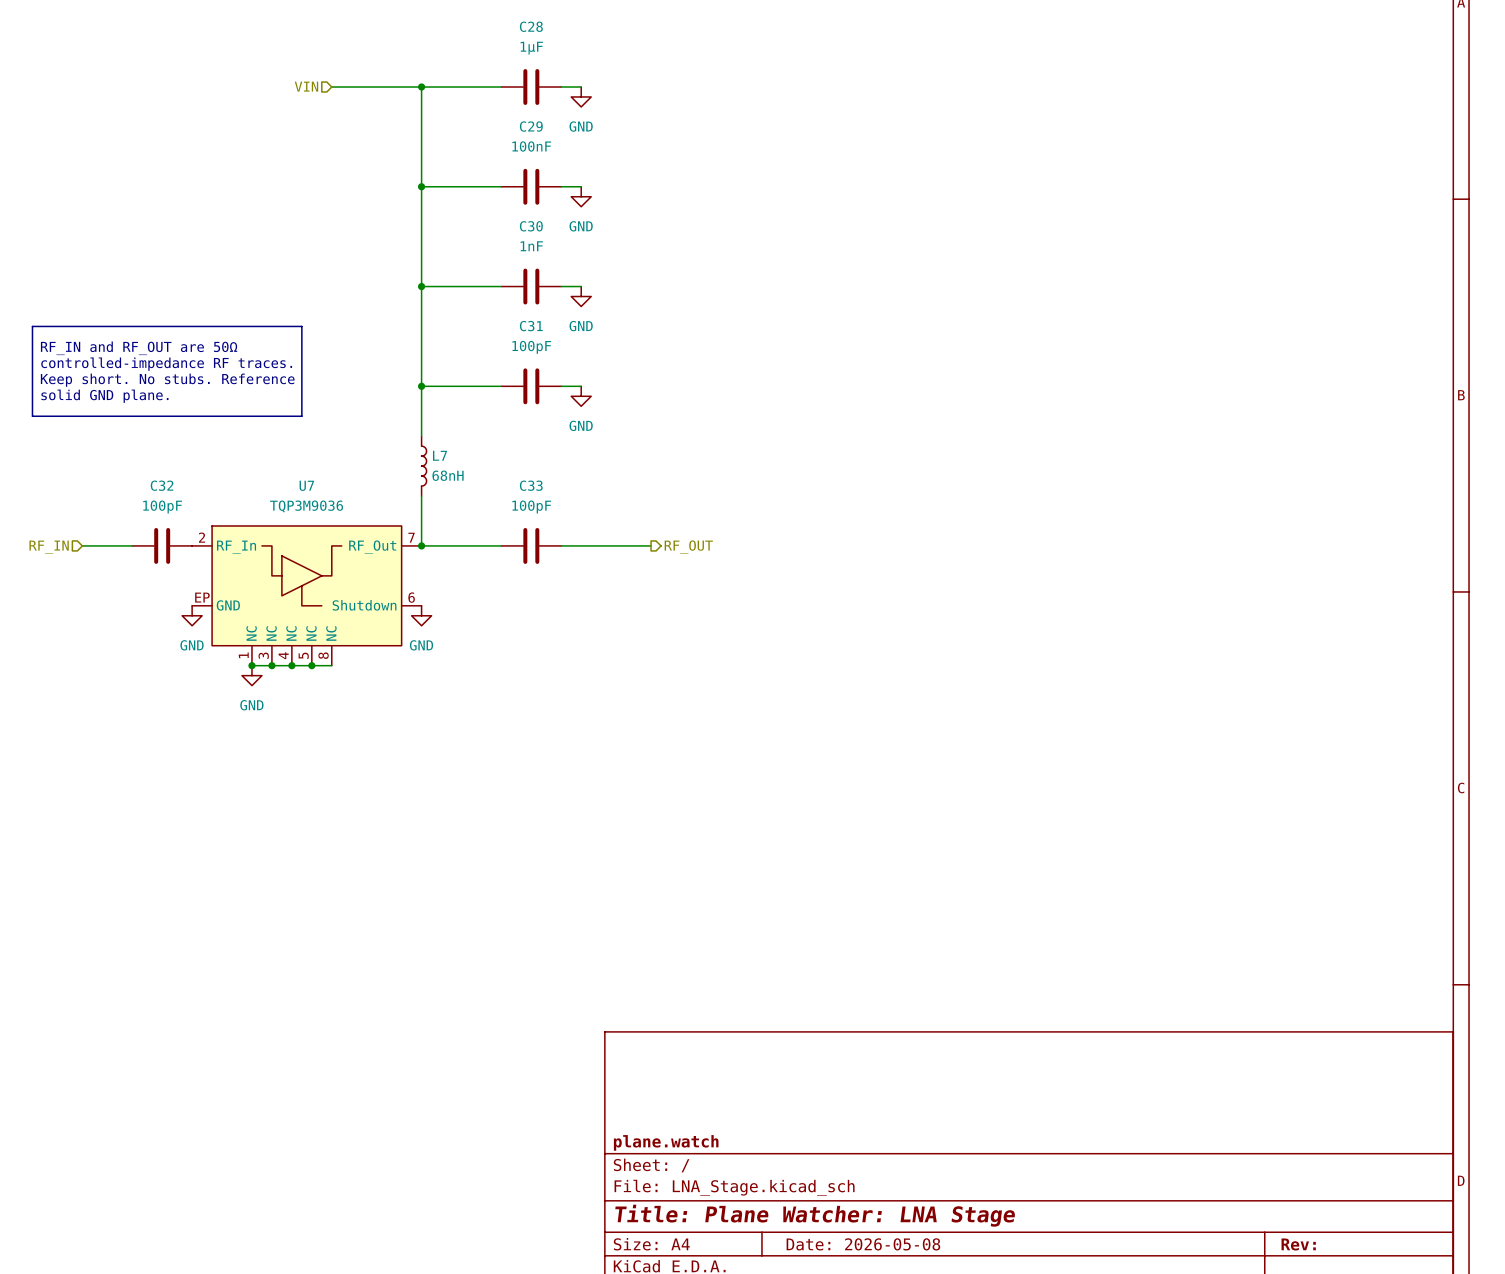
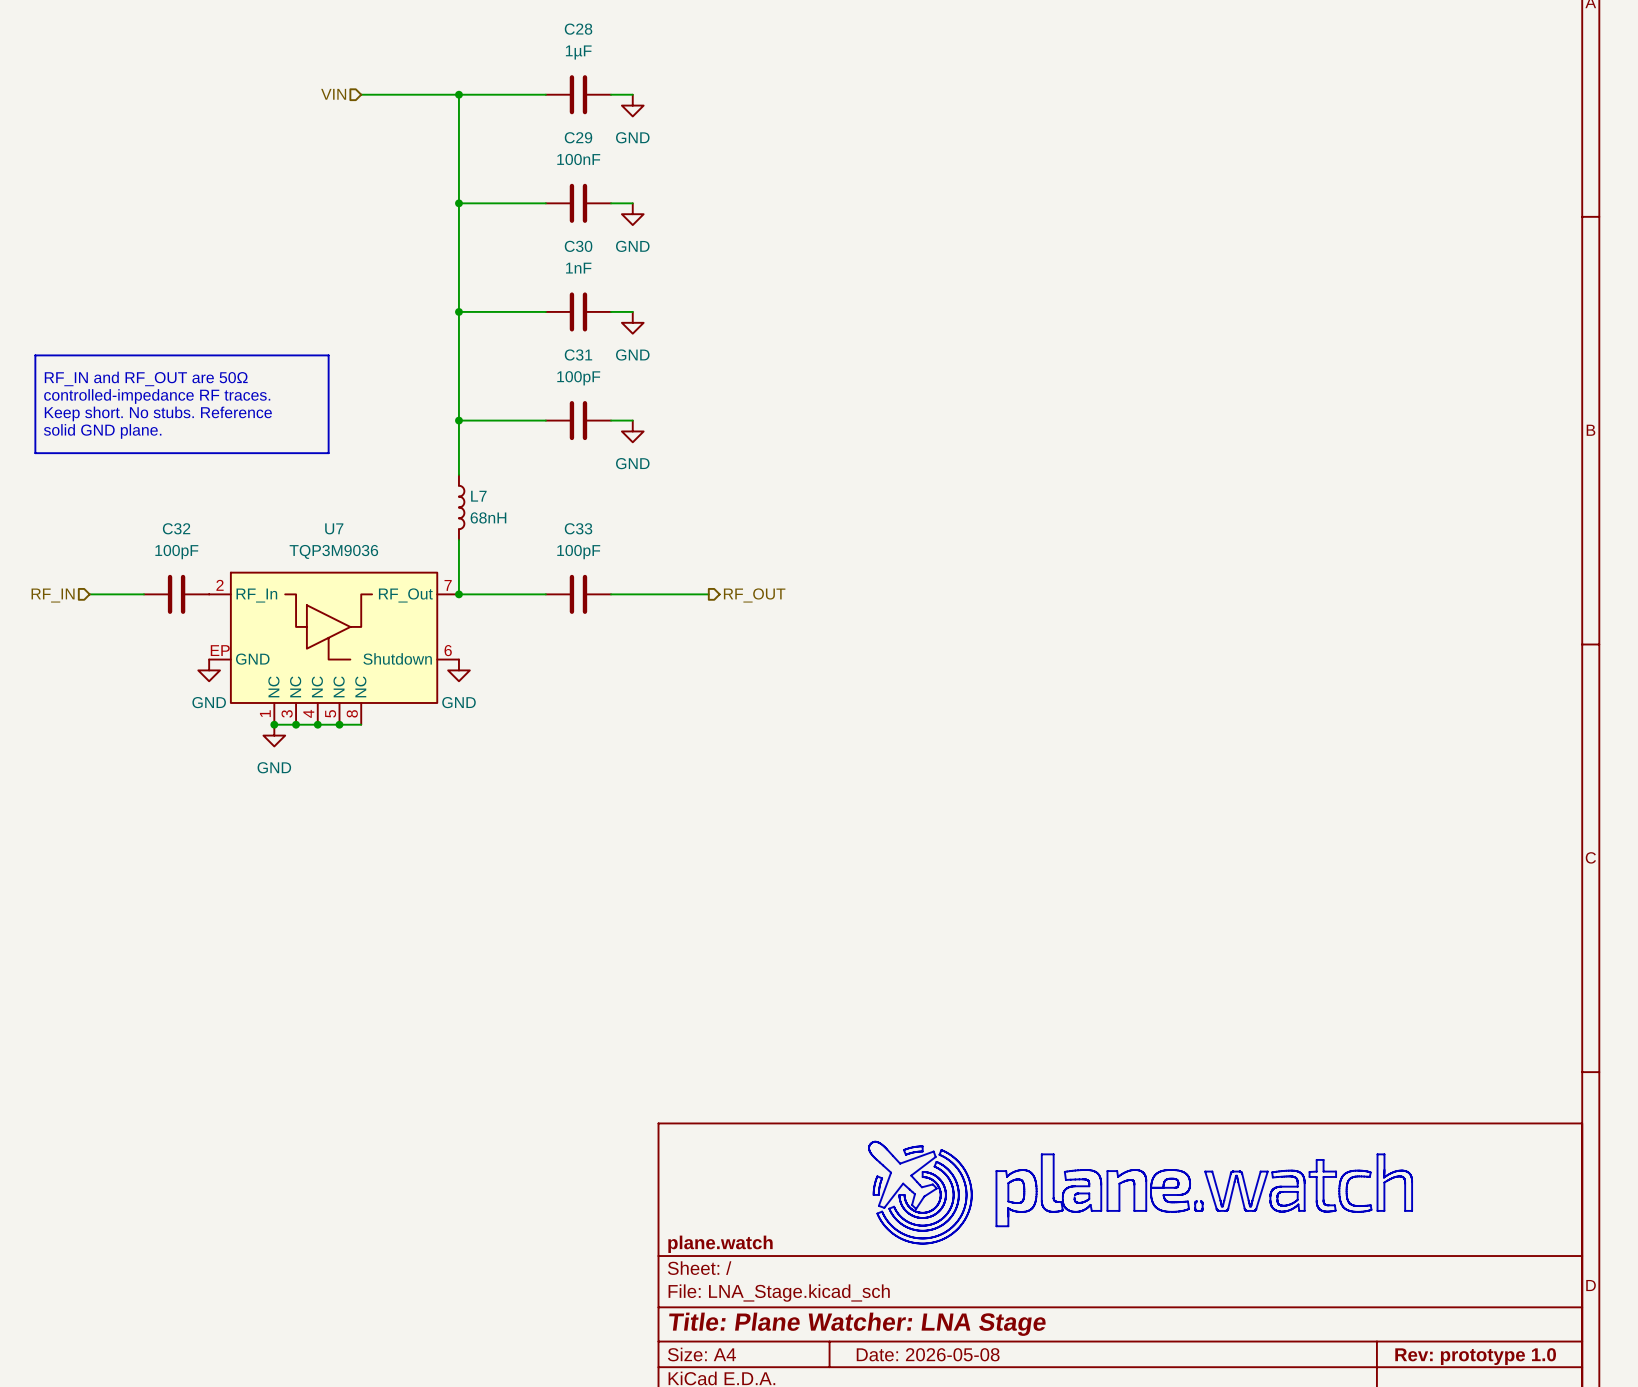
line: none -> (874, 1141) (869, 1145) (870, 1151) (891, 1172) (878, 1205) (884, 1207) (903, 1183) (914, 1194) (912, 1205) (916, 1208) (924, 1196) (936, 1188) (932, 1184) (921, 1187) (911, 1175) (935, 1156) (933, 1151) (900, 1163) (883, 1145) (874, 1141)
line: none -> (921, 1146) (911, 1147) (903, 1150) (905, 1154) (922, 1151) (921, 1146)
line: none -> (941, 1150) (939, 1154) (954, 1165) (964, 1181) (966, 1197) (962, 1212) (955, 1223) (946, 1231) (935, 1236) (922, 1238) (901, 1232) (890, 1224) (882, 1211) (877, 1213) (888, 1229) (902, 1239) (921, 1243) (940, 1240) (956, 1230) (967, 1214) (971, 1194) (968, 1176) (957, 1160) (941, 1150)
line: none -> (1041, 1154) (1053, 1154) (1053, 1198) (1055, 1201) (1061, 1201) (1061, 1210) (1049, 1211) (1042, 1205) (1041, 1154)
line: none -> (1377, 1154) (1377, 1210) (1384, 1210) (1384, 1182) (1399, 1176) (1403, 1177) (1404, 1180) (1405, 1210) (1412, 1210) (1410, 1174) (1406, 1171) (1399, 1170) (1383, 1177) (1384, 1154) (1377, 1154)
line: none -> (1316, 1159) (1316, 1171) (1309, 1171) (1309, 1176) (1316, 1176) (1317, 1206) (1323, 1211) (1335, 1210) (1334, 1205) (1326, 1205) (1323, 1202) (1323, 1176) (1336, 1176) (1336, 1171) (1323, 1171) (1323, 1159) (1316, 1159)
line: none -> (936, 1161) (934, 1166) (945, 1173) (952, 1185) (953, 1196) (951, 1207) (939, 1220) (923, 1225) (905, 1220) (894, 1206) (889, 1208) (897, 1220) (908, 1227) (921, 1230) (935, 1228) (947, 1220) (955, 1209) (958, 1195) (956, 1182) (948, 1170) (936, 1161)
line: none -> (1021, 1170) (1013, 1171) (1007, 1176) (1006, 1171) (996, 1171) (996, 1226) (1008, 1226) (1008, 1208) (1016, 1211) (1024, 1211) (1030, 1209) (1034, 1204) (1036, 1191) (1034, 1178) (1029, 1171) (1021, 1170)
line: none -> (1083, 1169) (1064, 1171) (1065, 1179) (1086, 1179) (1089, 1186) (1073, 1186) (1066, 1188) (1062, 1194) (1063, 1205) (1073, 1211) (1082, 1210) (1090, 1204) (1091, 1210) (1101, 1210) (1099, 1176) (1094, 1171) (1083, 1169)
line: none -> (1134, 1169) (1118, 1176) (1117, 1171) (1107, 1171) (1107, 1210) (1119, 1210) (1119, 1183) (1130, 1180) (1134, 1182) (1134, 1210) (1146, 1210) (1145, 1176) (1141, 1171) (1134, 1169)
line: none -> (1291, 1170) (1272, 1172) (1272, 1177) (1292, 1176) (1297, 1181) (1297, 1186) (1278, 1186) (1272, 1190) (1270, 1204) (1277, 1210) (1288, 1210) (1298, 1204) (1299, 1210) (1304, 1210) (1303, 1177) (1299, 1172) (1291, 1170)
line: none -> (1358, 1170) (1347, 1172) (1341, 1178) (1339, 1188) (1340, 1202) (1344, 1208) (1351, 1211) (1371, 1209) (1370, 1205) (1353, 1205) (1347, 1199) (1346, 1187) (1349, 1179) (1355, 1176) (1369, 1176) (1370, 1172) (1358, 1170)
line: none -> (922, 1171) (922, 1177) (933, 1180) (939, 1188) (940, 1198) (935, 1207) (926, 1212) (916, 1211) (907, 1205) (904, 1194) (899, 1194) (901, 1203) (906, 1211) (913, 1216) (922, 1218) (931, 1216) (939, 1211) (944, 1203) (945, 1194) (944, 1186) (939, 1178) (931, 1173) (922, 1171)
line: none -> (1233, 1171) (1239, 1171)
line: none -> (1241, 1173) (1251, 1206) (1260, 1171) (1267, 1171) (1256, 1208)
line: none -> (1230, 1173) (1221, 1206) (1212, 1171) (1205, 1171) (1216, 1208)
line: none -> (877, 1176) (874, 1185) (873, 1194) (878, 1194) (882, 1178) (877, 1176)
line: none -> (1017, 1179) (1021, 1180) (1023, 1183) (1023, 1199) (1019, 1202) (1008, 1201) (1008, 1183) (1017, 1179)
line: none -> (1151, 1187) (1152, 1201) (1158, 1209) (1171, 1211) (1189, 1208) (1187, 1201) (1168, 1201) (1163, 1195) (1181, 1194) (1187, 1191) (1189, 1180) (1183, 1172) (1171, 1169) (1159, 1172) (1153, 1177) (1151, 1187)
line: none -> (1151, 1187) (1174, 1187) (1176, 1187) (1178, 1185) (1177, 1181) (1174, 1178) (1166, 1179) (1164, 1181) (1163, 1184) (1163, 1185) (1163, 1186) (1163, 1187)
line: none -> (1281, 1191) (1297, 1191) (1297, 1199) (1288, 1204) (1279, 1205) (1277, 1196) (1281, 1191)
line: none -> (1075, 1194) (1089, 1193) (1089, 1199) (1078, 1202) (1075, 1201) (1074, 1197)
line: none -> (1195, 1203) (1195, 1208)
line: none -> (1202, 1203) (1202, 1208)
line: none -> (1228, 1208) (1235, 1175) (1244, 1208)
line: none -> (1217, 1209) (1225, 1210)
line: none -> (1197, 1210) (1200, 1210)
line: none -> (1247, 1210) (1253, 1210)
title block: Rev: (1298, 1244) -> Rev: prototype 1.0 (1475, 1356)

